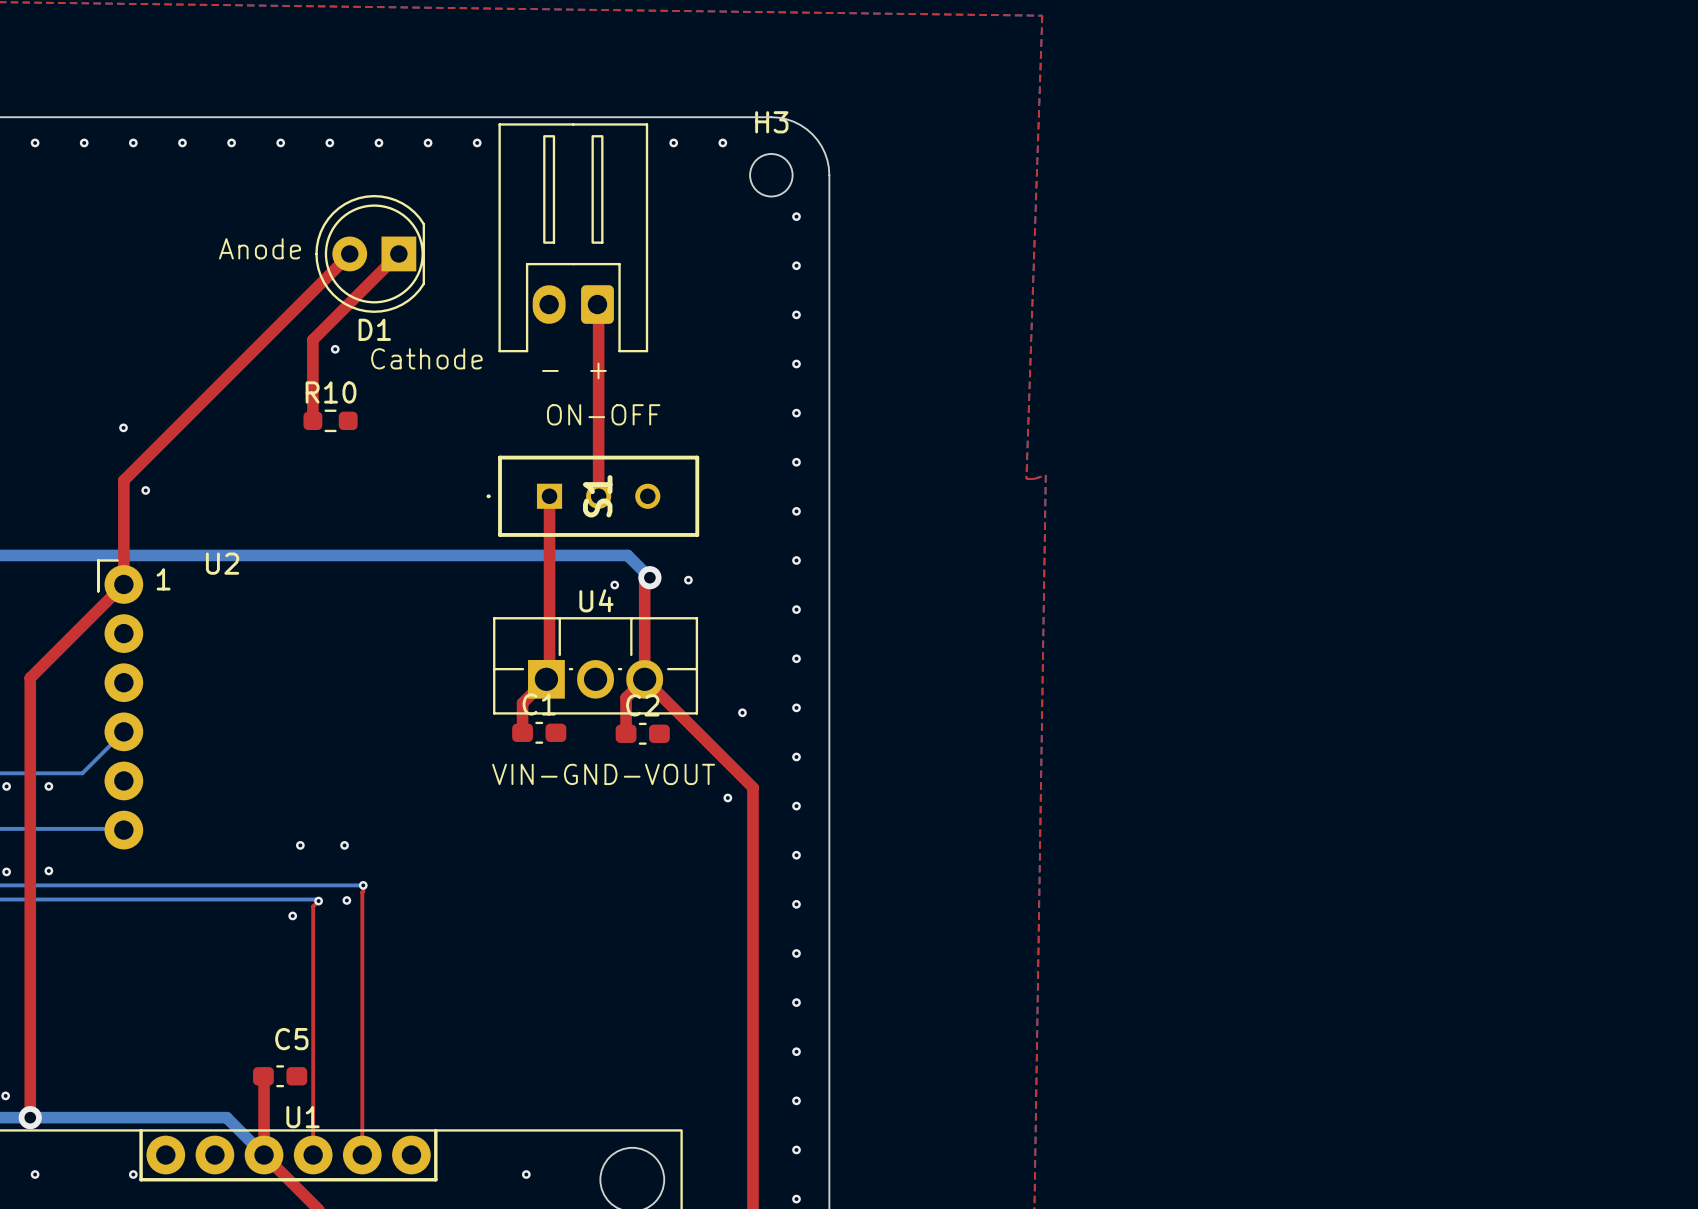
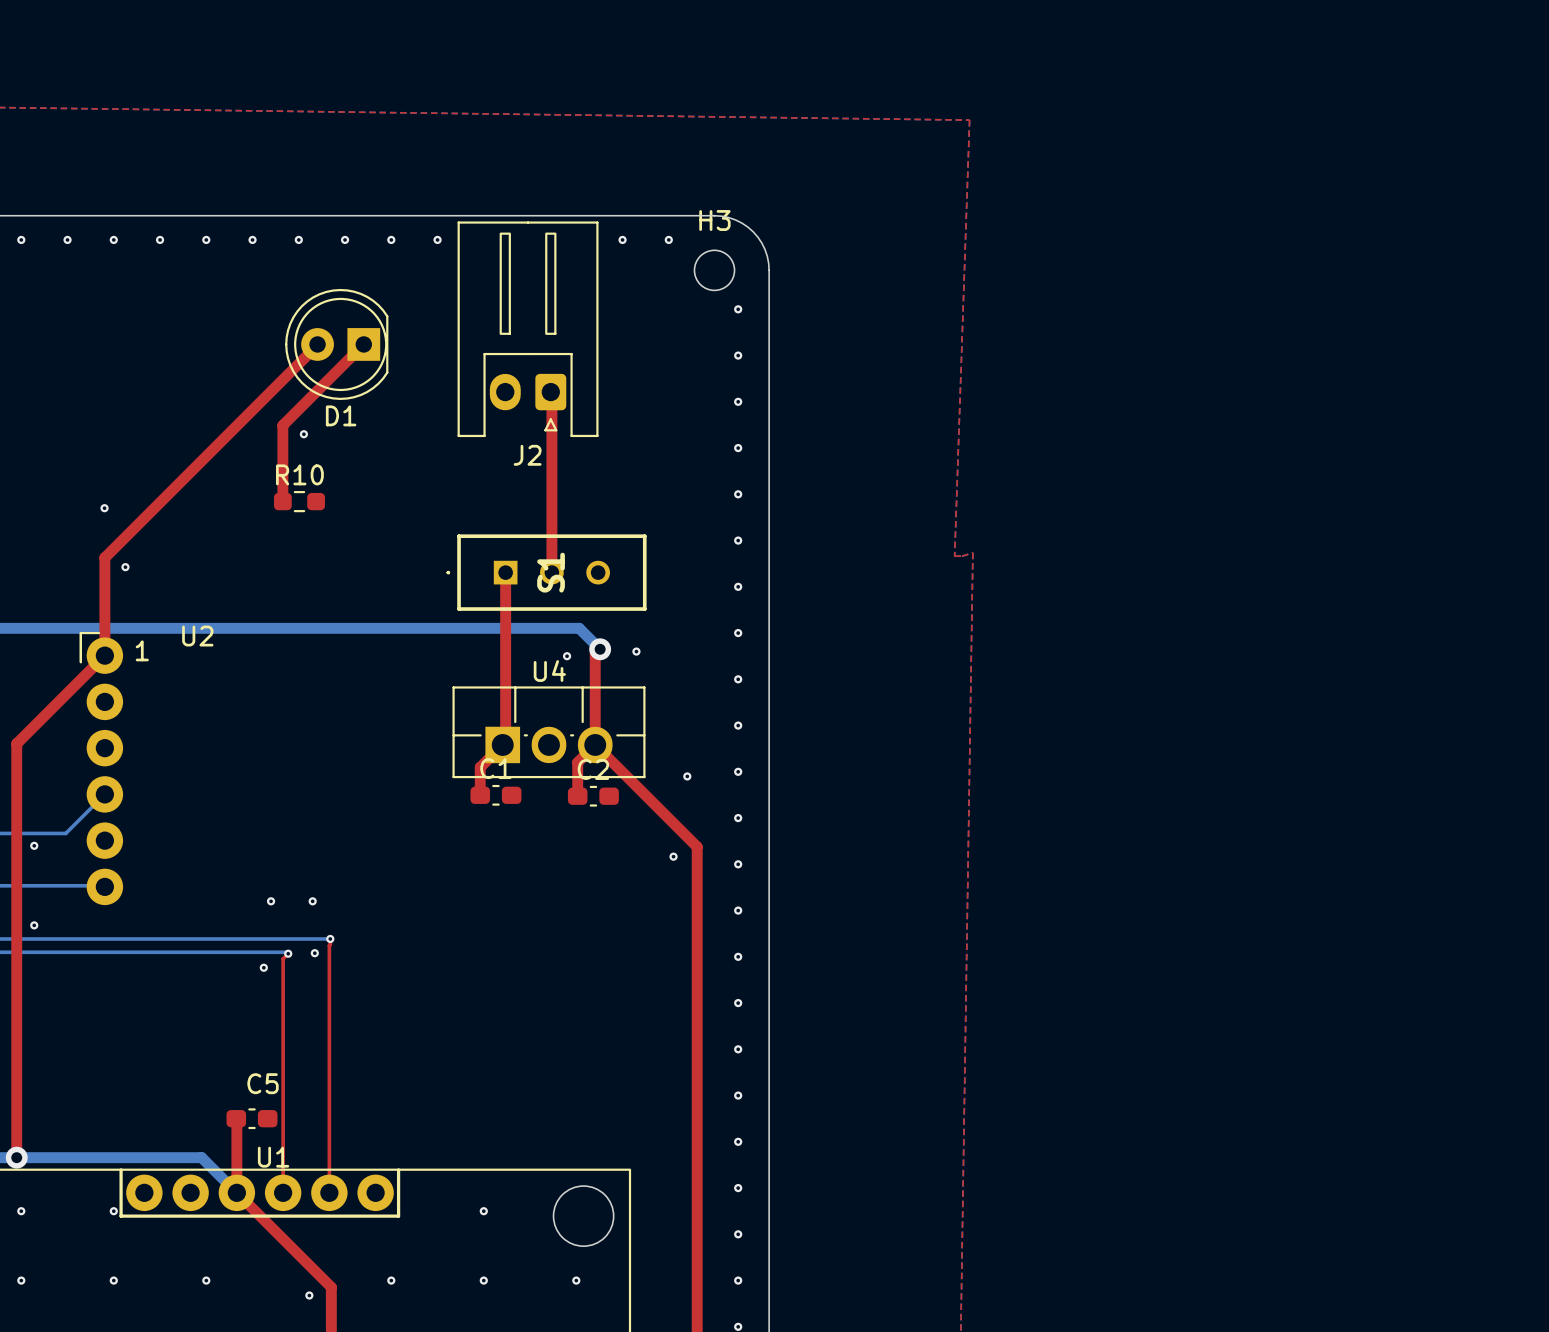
J2: none -> (528, 329)
text: Anode (260, 248) -> none
text: Cathode (426, 358) -> none
text: - (550, 370) -> none
text: + (598, 370) -> none
text: ON-OFF (603, 414) -> none
text: VIN-GND-VOUT (603, 774) -> none

